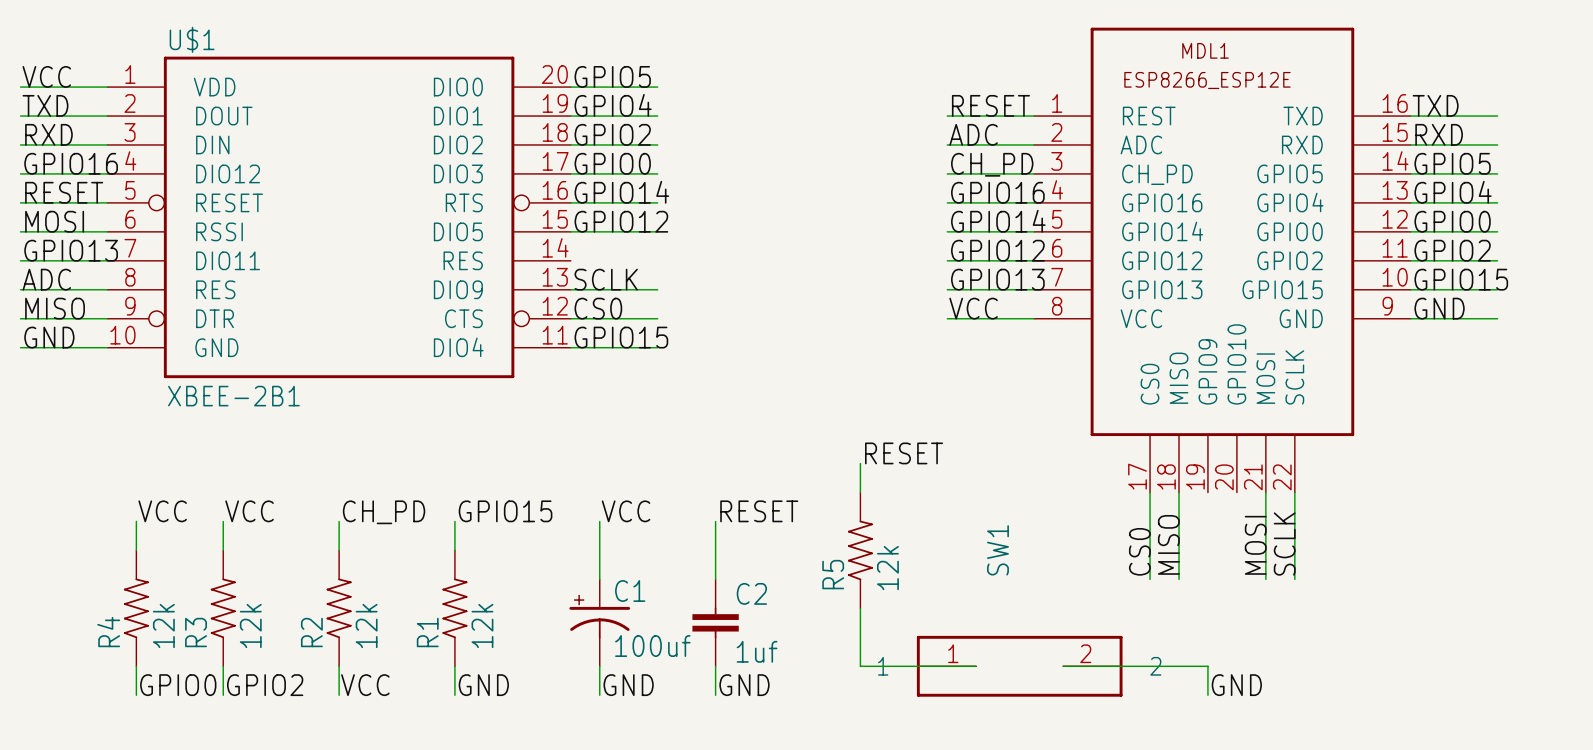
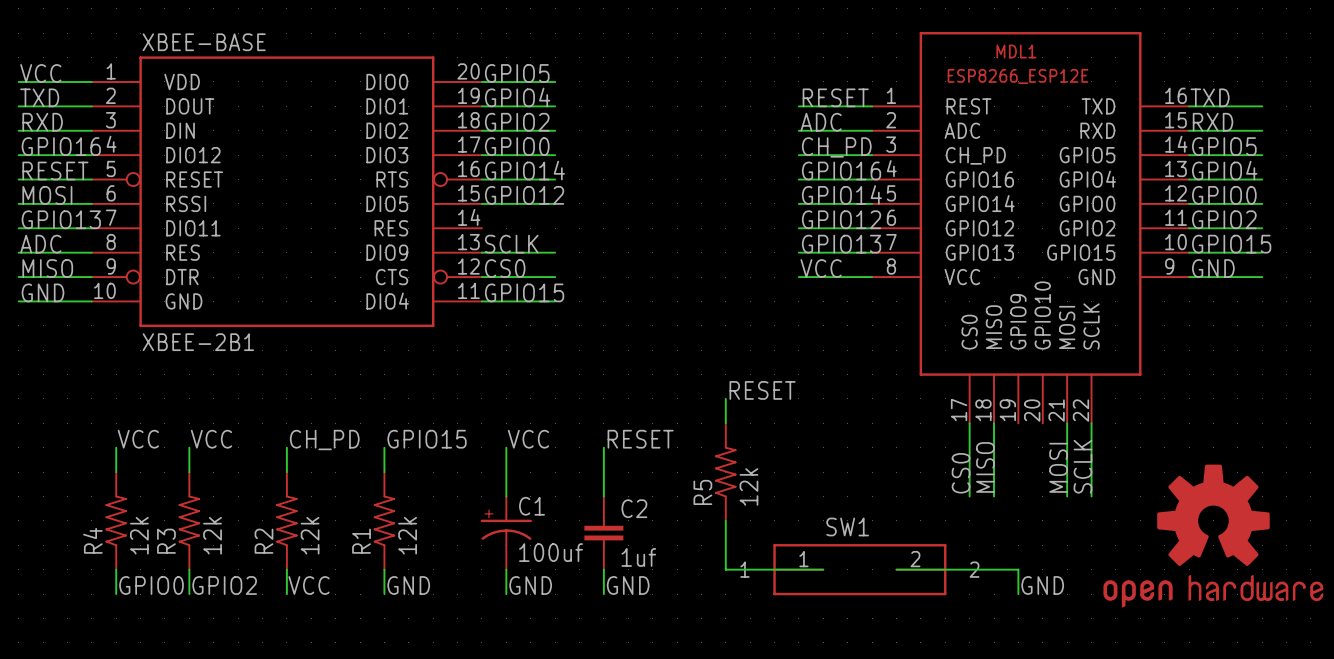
U$1 name: U$1 (192, 39) -> XBEE-BASE (204, 42)
SW1 name rotation: 0° (997, 550) -> 90° clockwise (847, 526)
part: none -> (1213, 535)

